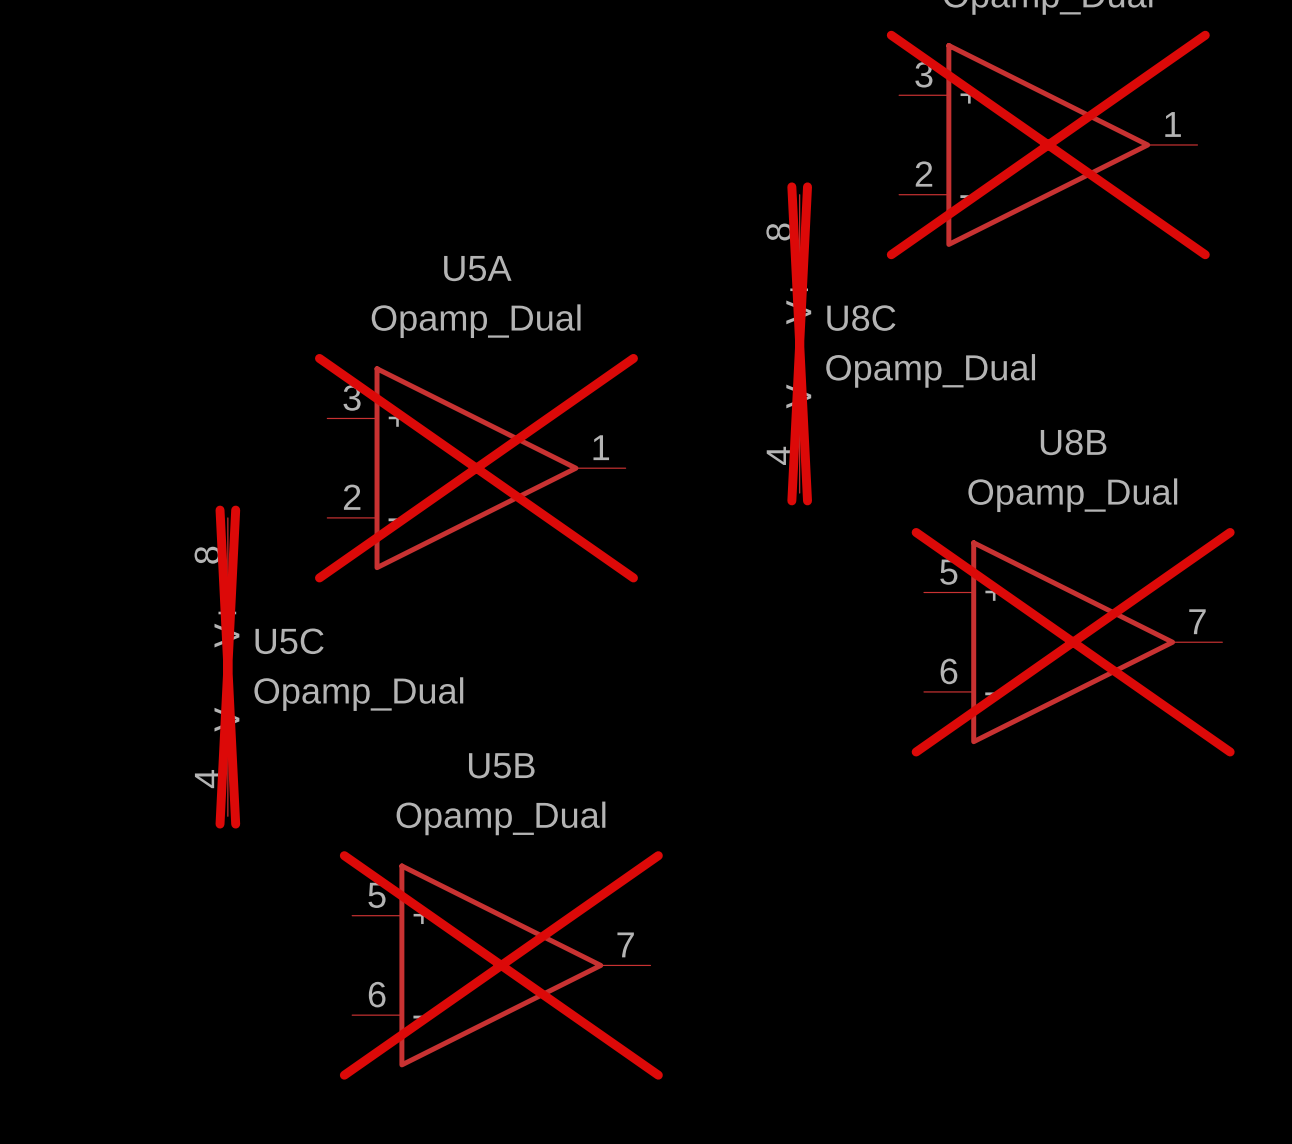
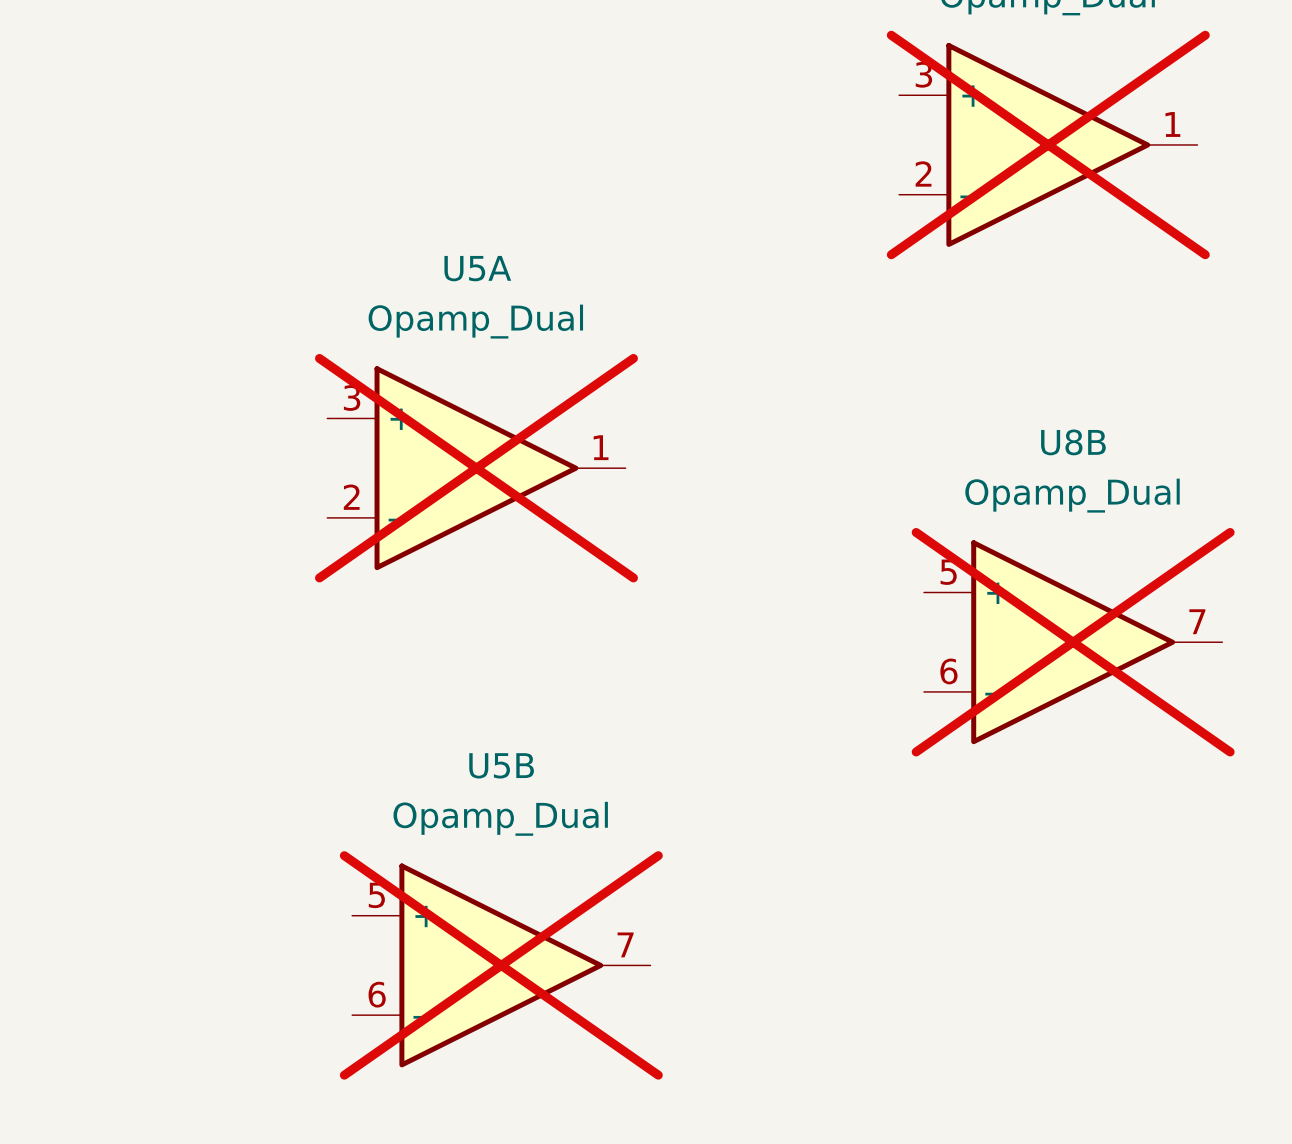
U8C: Opamp_Dual (799, 343) -> none
U5C: Opamp_Dual (227, 667) -> none

